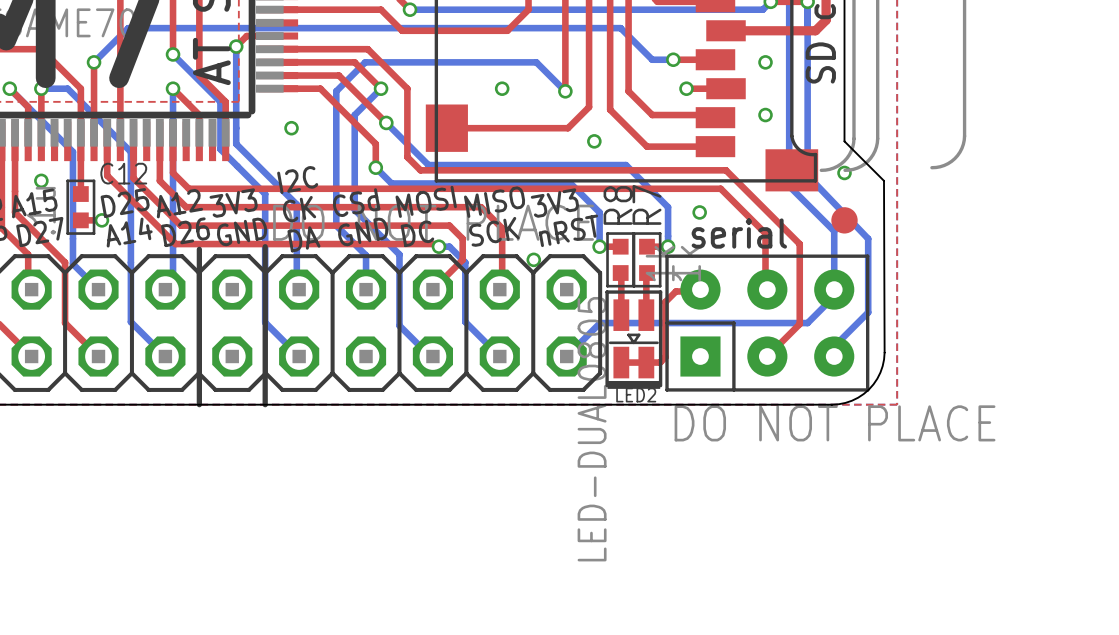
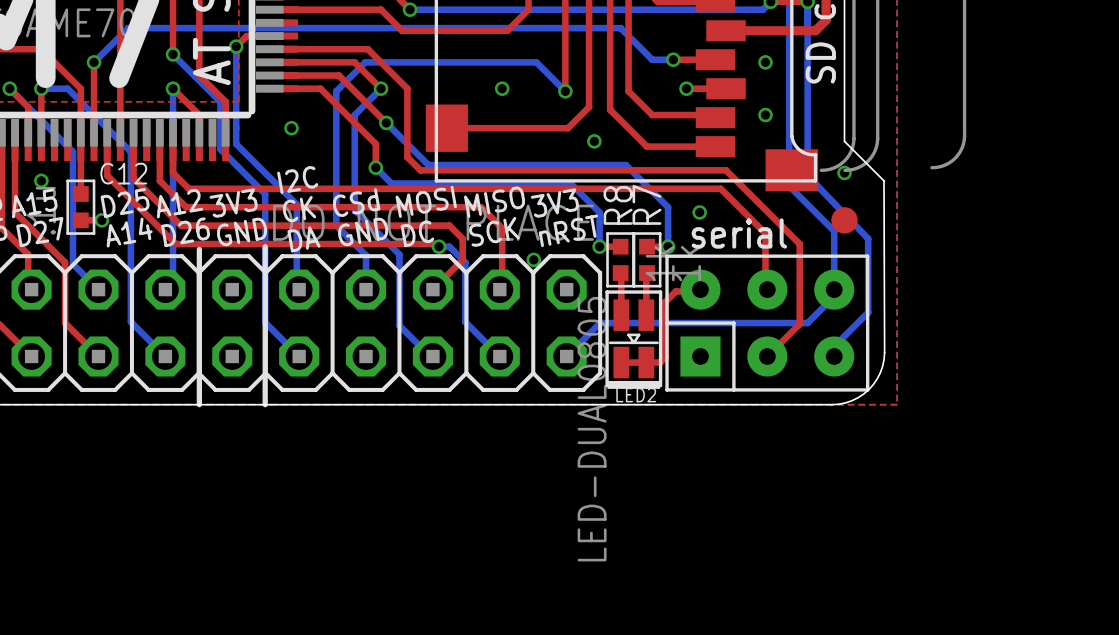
part value: DO NOT PLACE (835, 423) -> none

